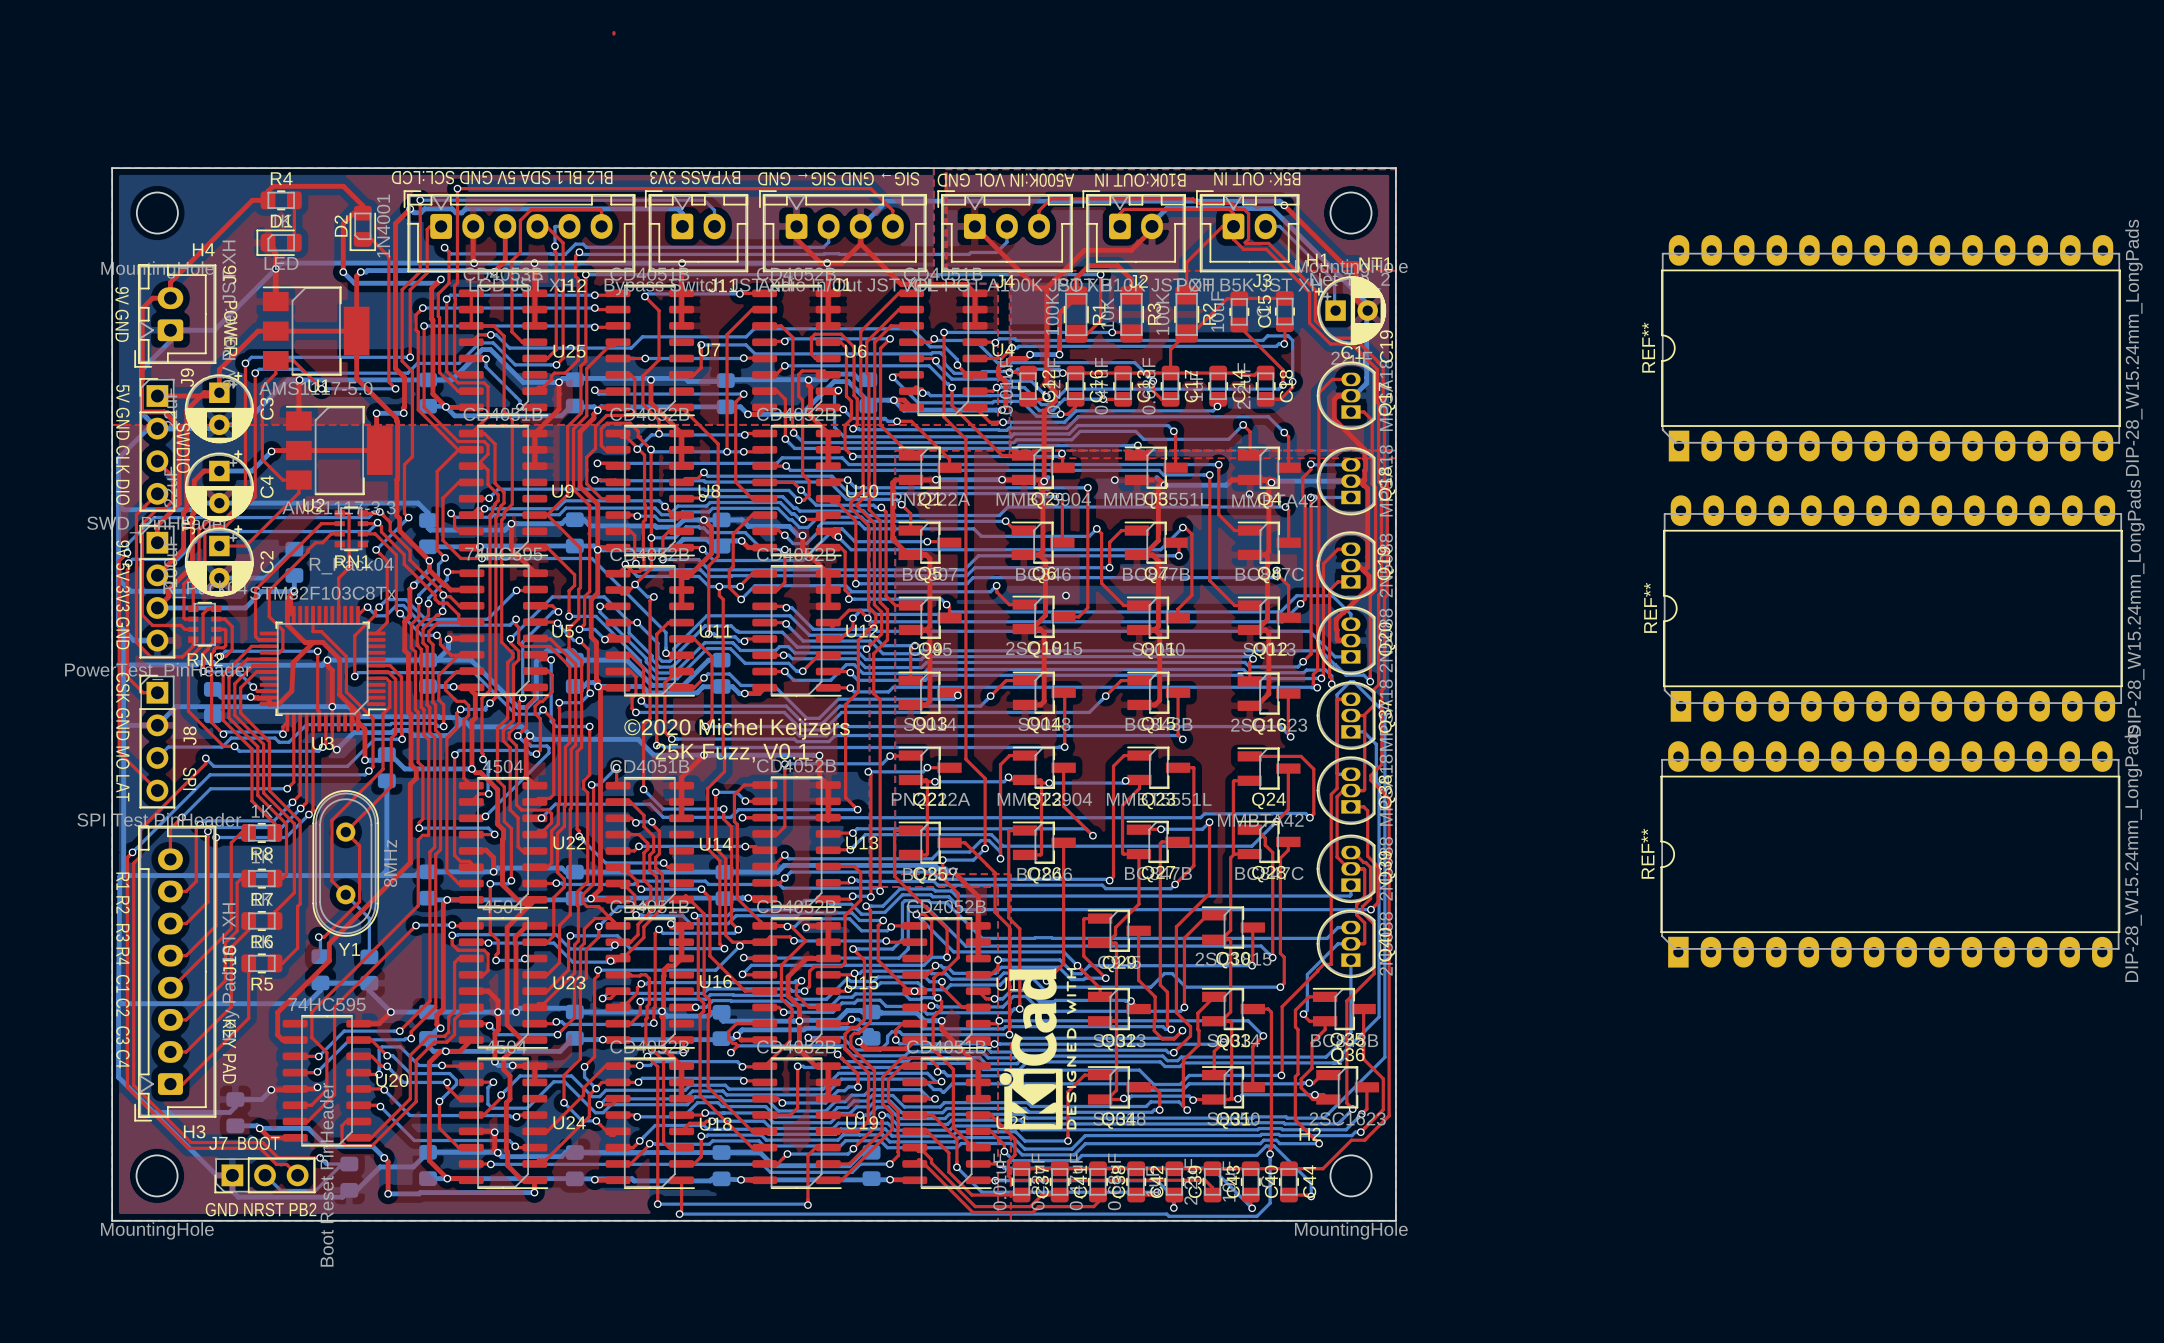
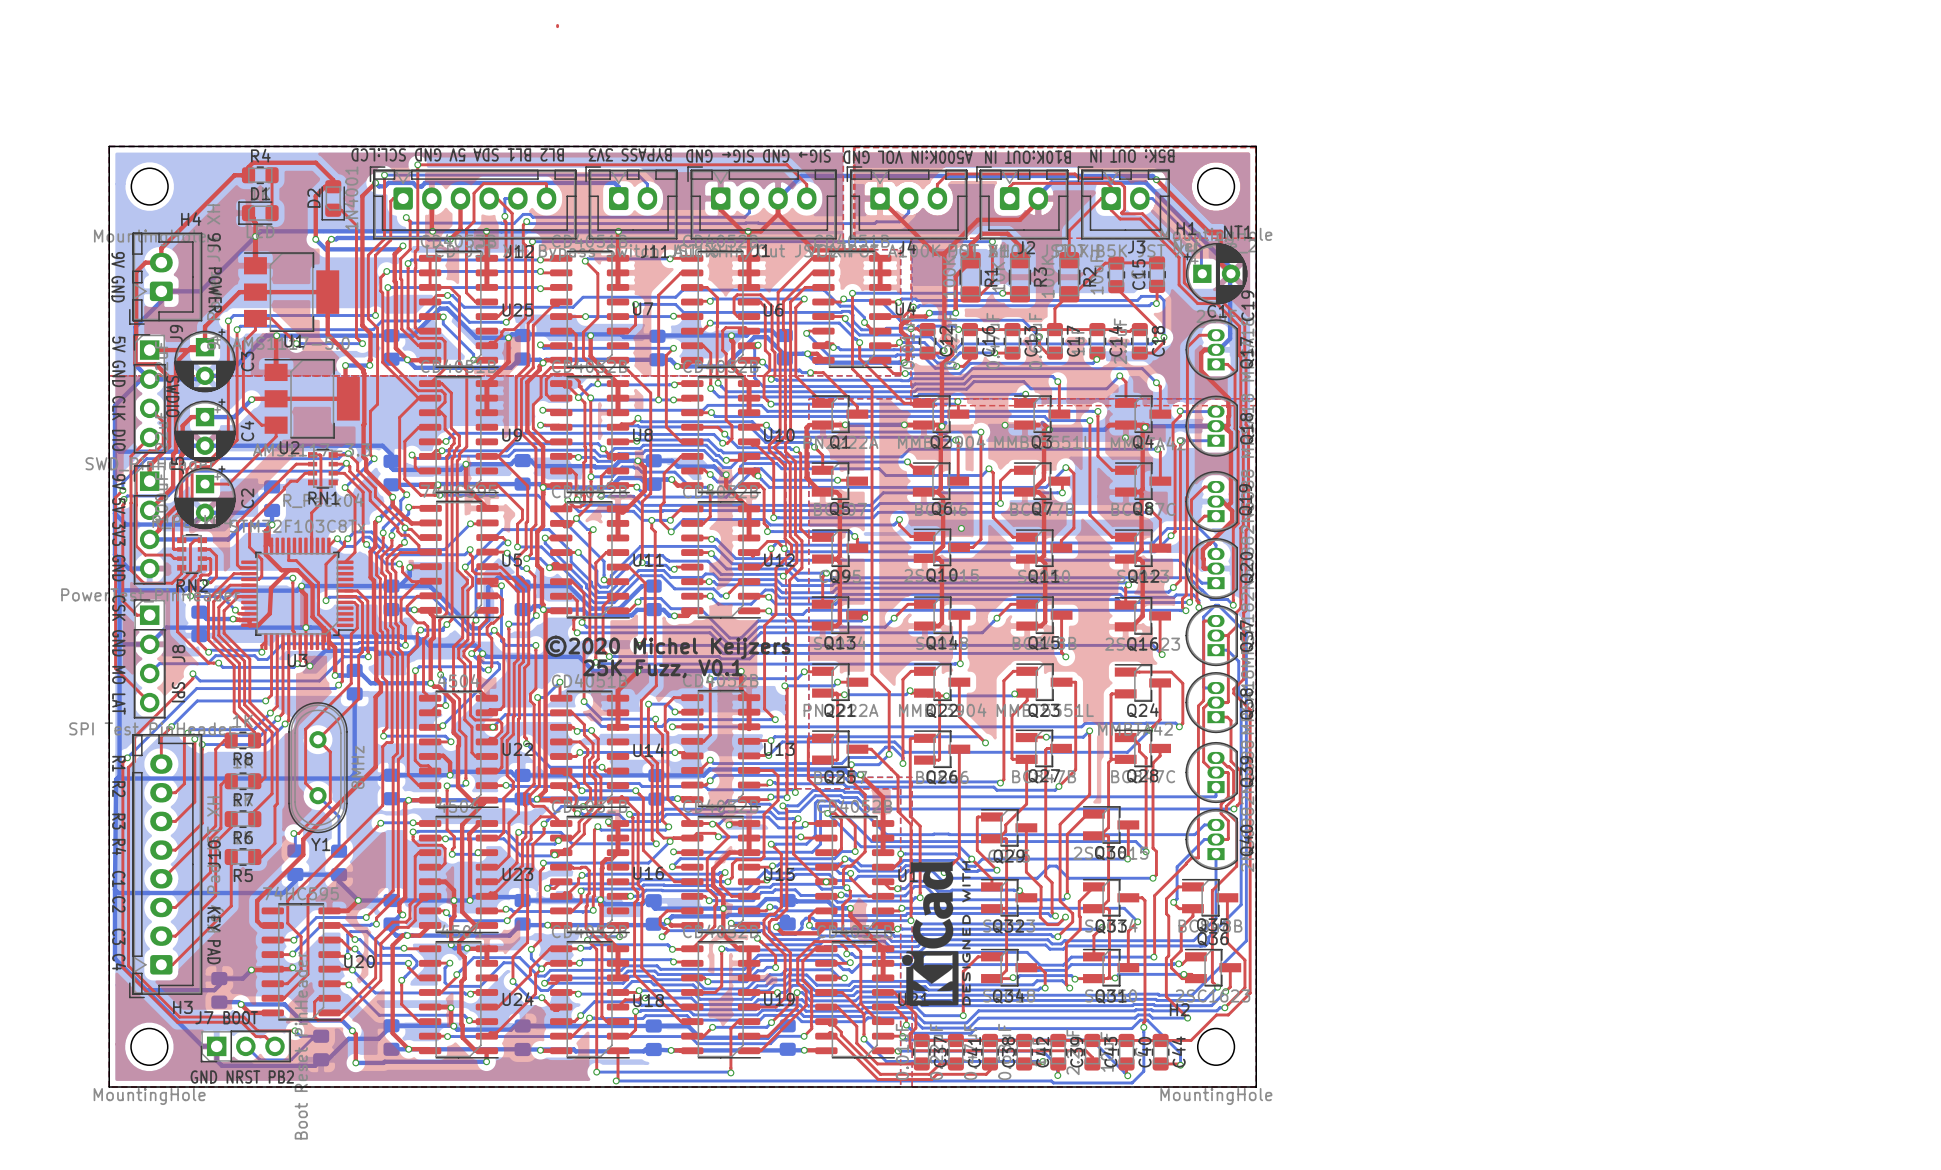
REF**: DIP-28_W15.24mm_LongPads (1890, 348) -> none
REF**: DIP-28_W15.24mm_LongPads (1892, 608) -> none
REF**: DIP-28_W15.24mm_LongPads (1890, 854) -> none

